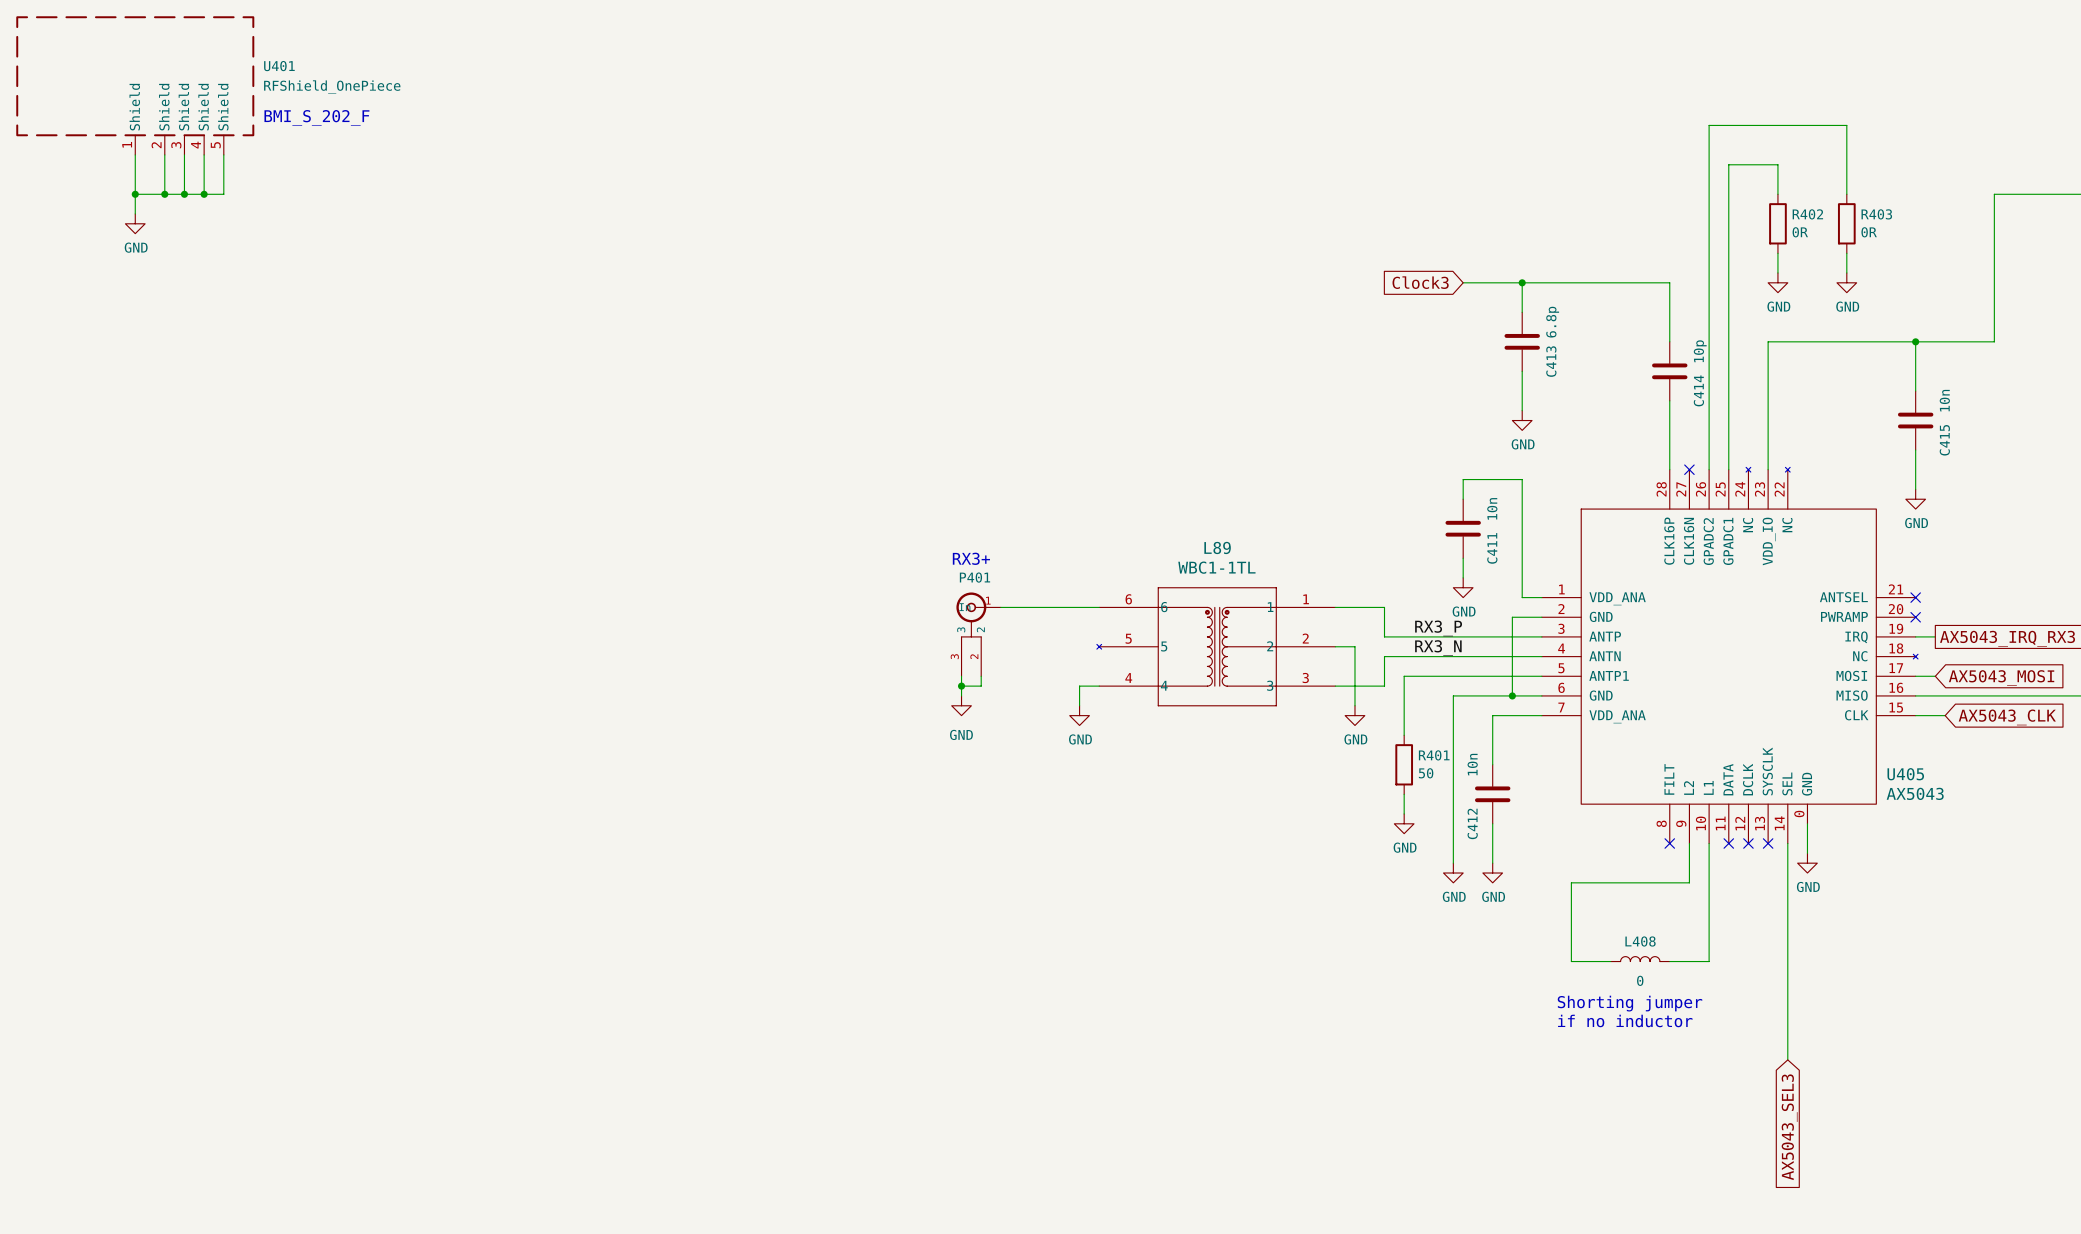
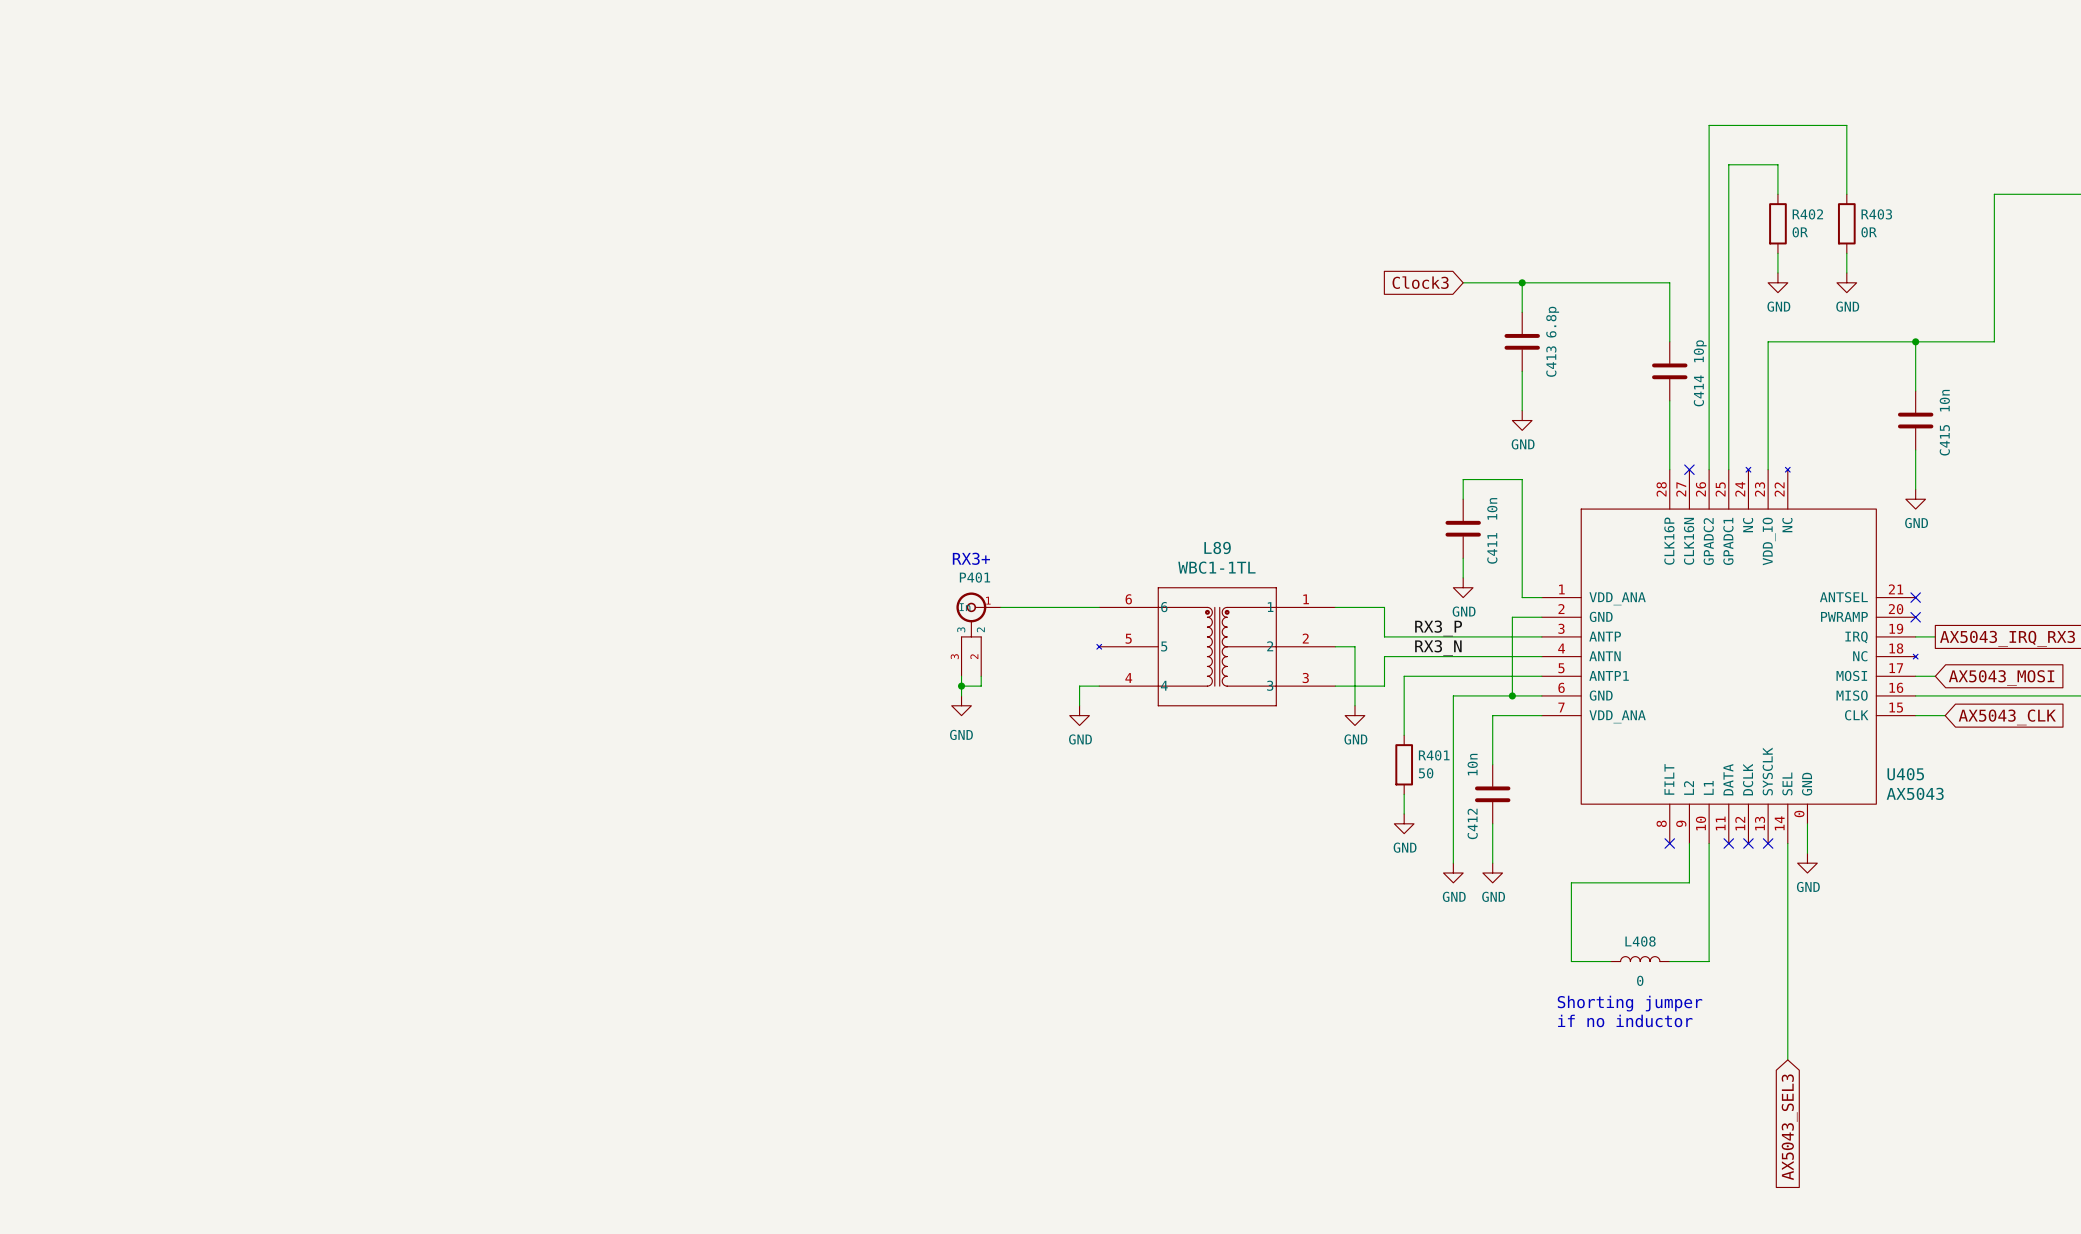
U401: RFShield_OnePiece (135, 85) -> none
text: BMI_S_202_F (316, 117) -> none
wire: (135, 154) (135, 213) -> none
wire: (164, 154) (164, 194) -> none
wire: (184, 154) (184, 194) -> none
wire: (204, 154) (204, 194) -> none
wire: (223, 154) (223, 194) (135, 194) -> none
junction: (135, 194) -> none
junction: (164, 194) -> none
junction: (184, 194) -> none
junction: (204, 194) -> none
power symbol: GND (135, 223) -> none

